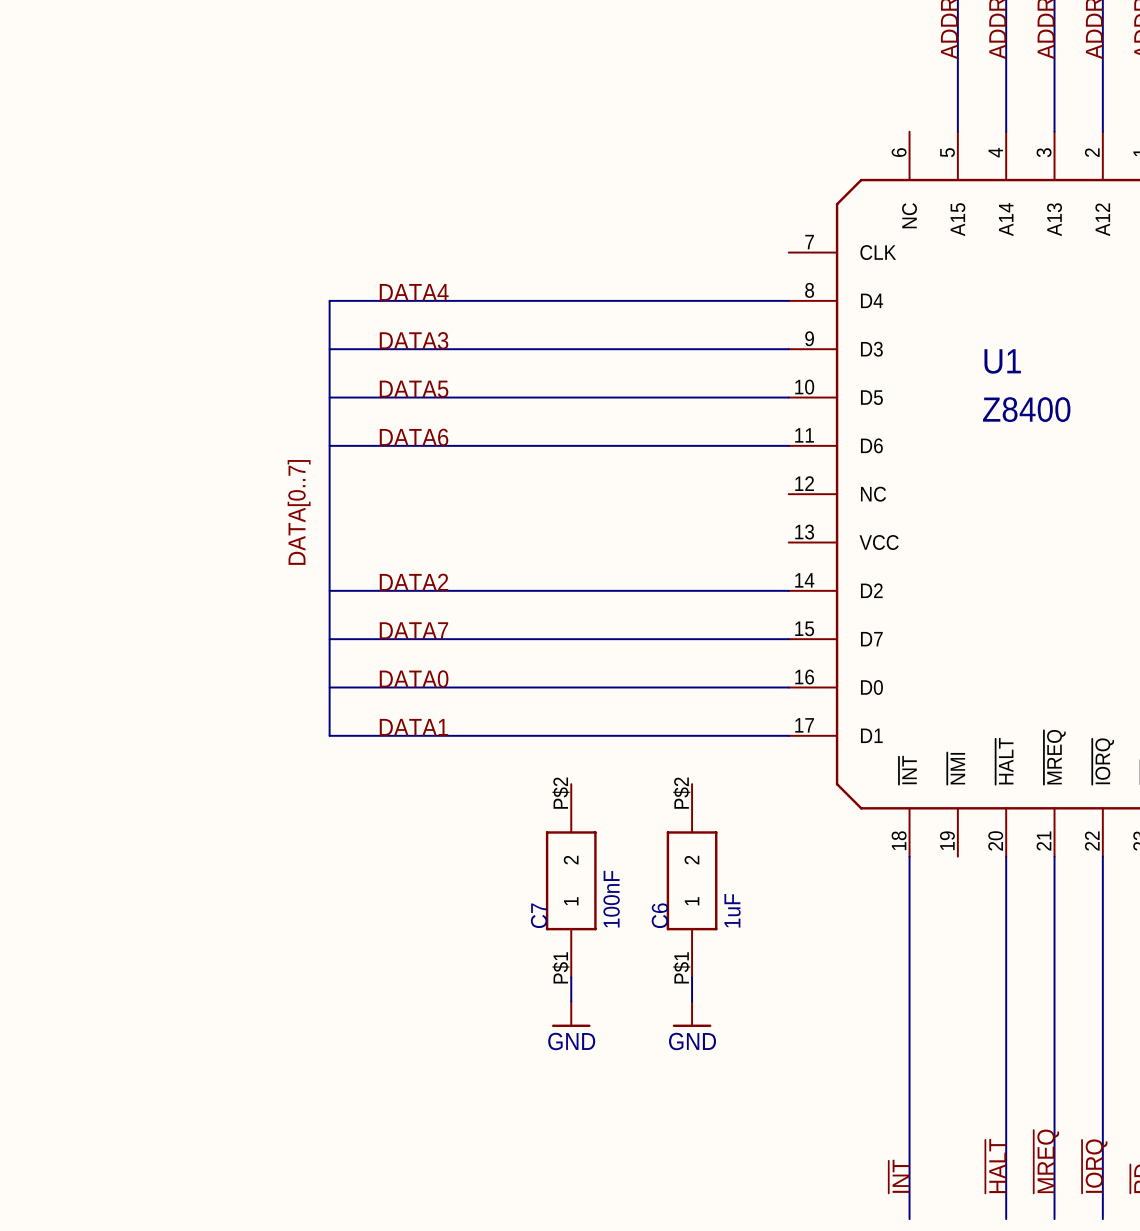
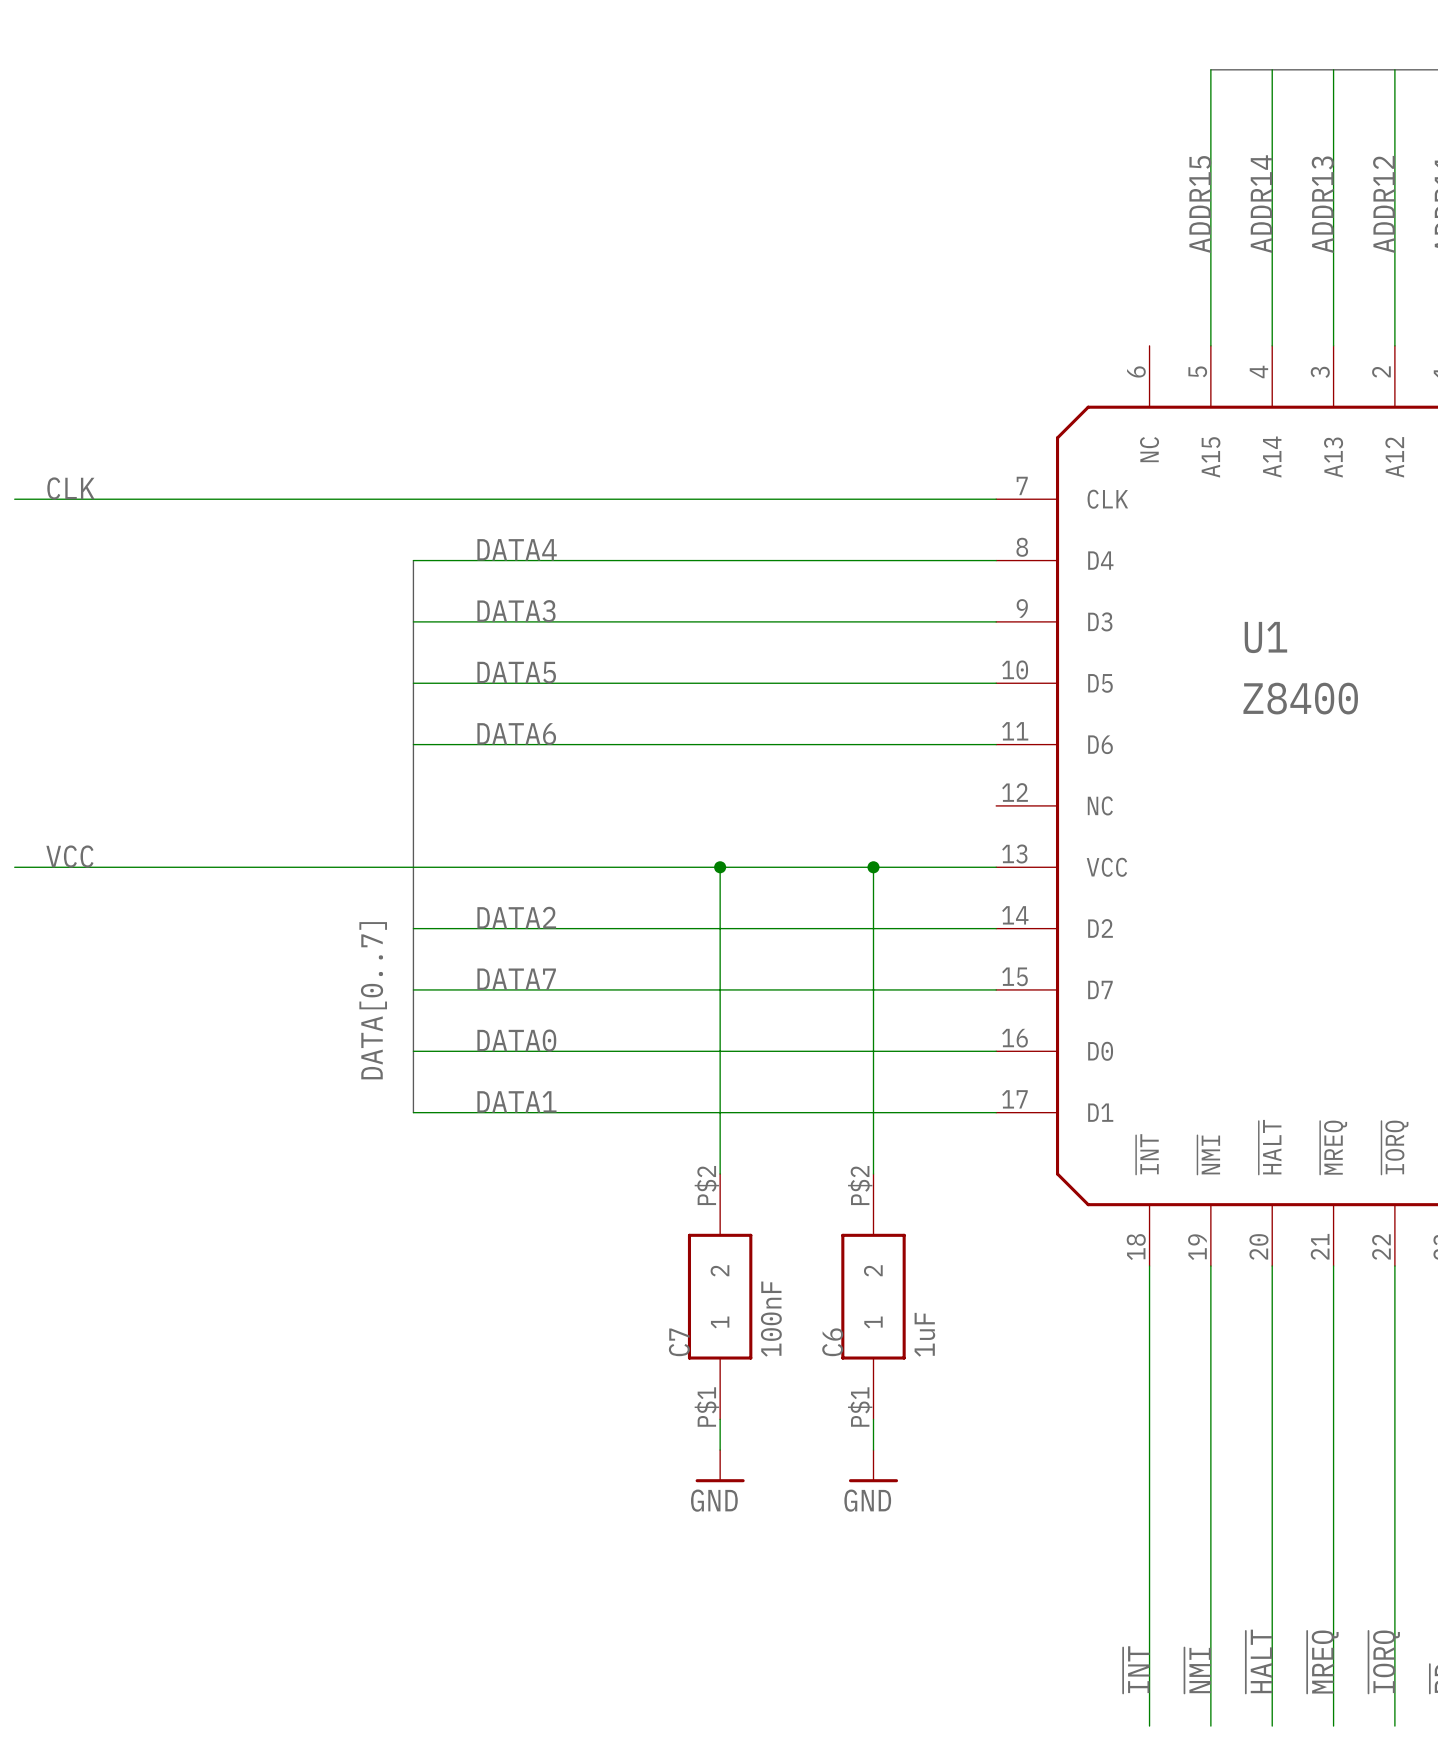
label: none -> CLK (70, 488)
wire: none -> (14, 499) (996, 499)
label position: DATA[0..7] (299, 512) -> DATA[0..7] (373, 1000)
label: none -> VCC (69, 856)
wire: none -> (14, 867) (996, 867)
wire: none -> (720, 867) (720, 1173)
junction: none -> (720, 867)
wire: none -> (873, 867) (873, 1173)
junction: none -> (873, 867)
wire: none -> (1210, 1266) (1210, 1726)
label: none -> ~{NMI} (1197, 1670)

